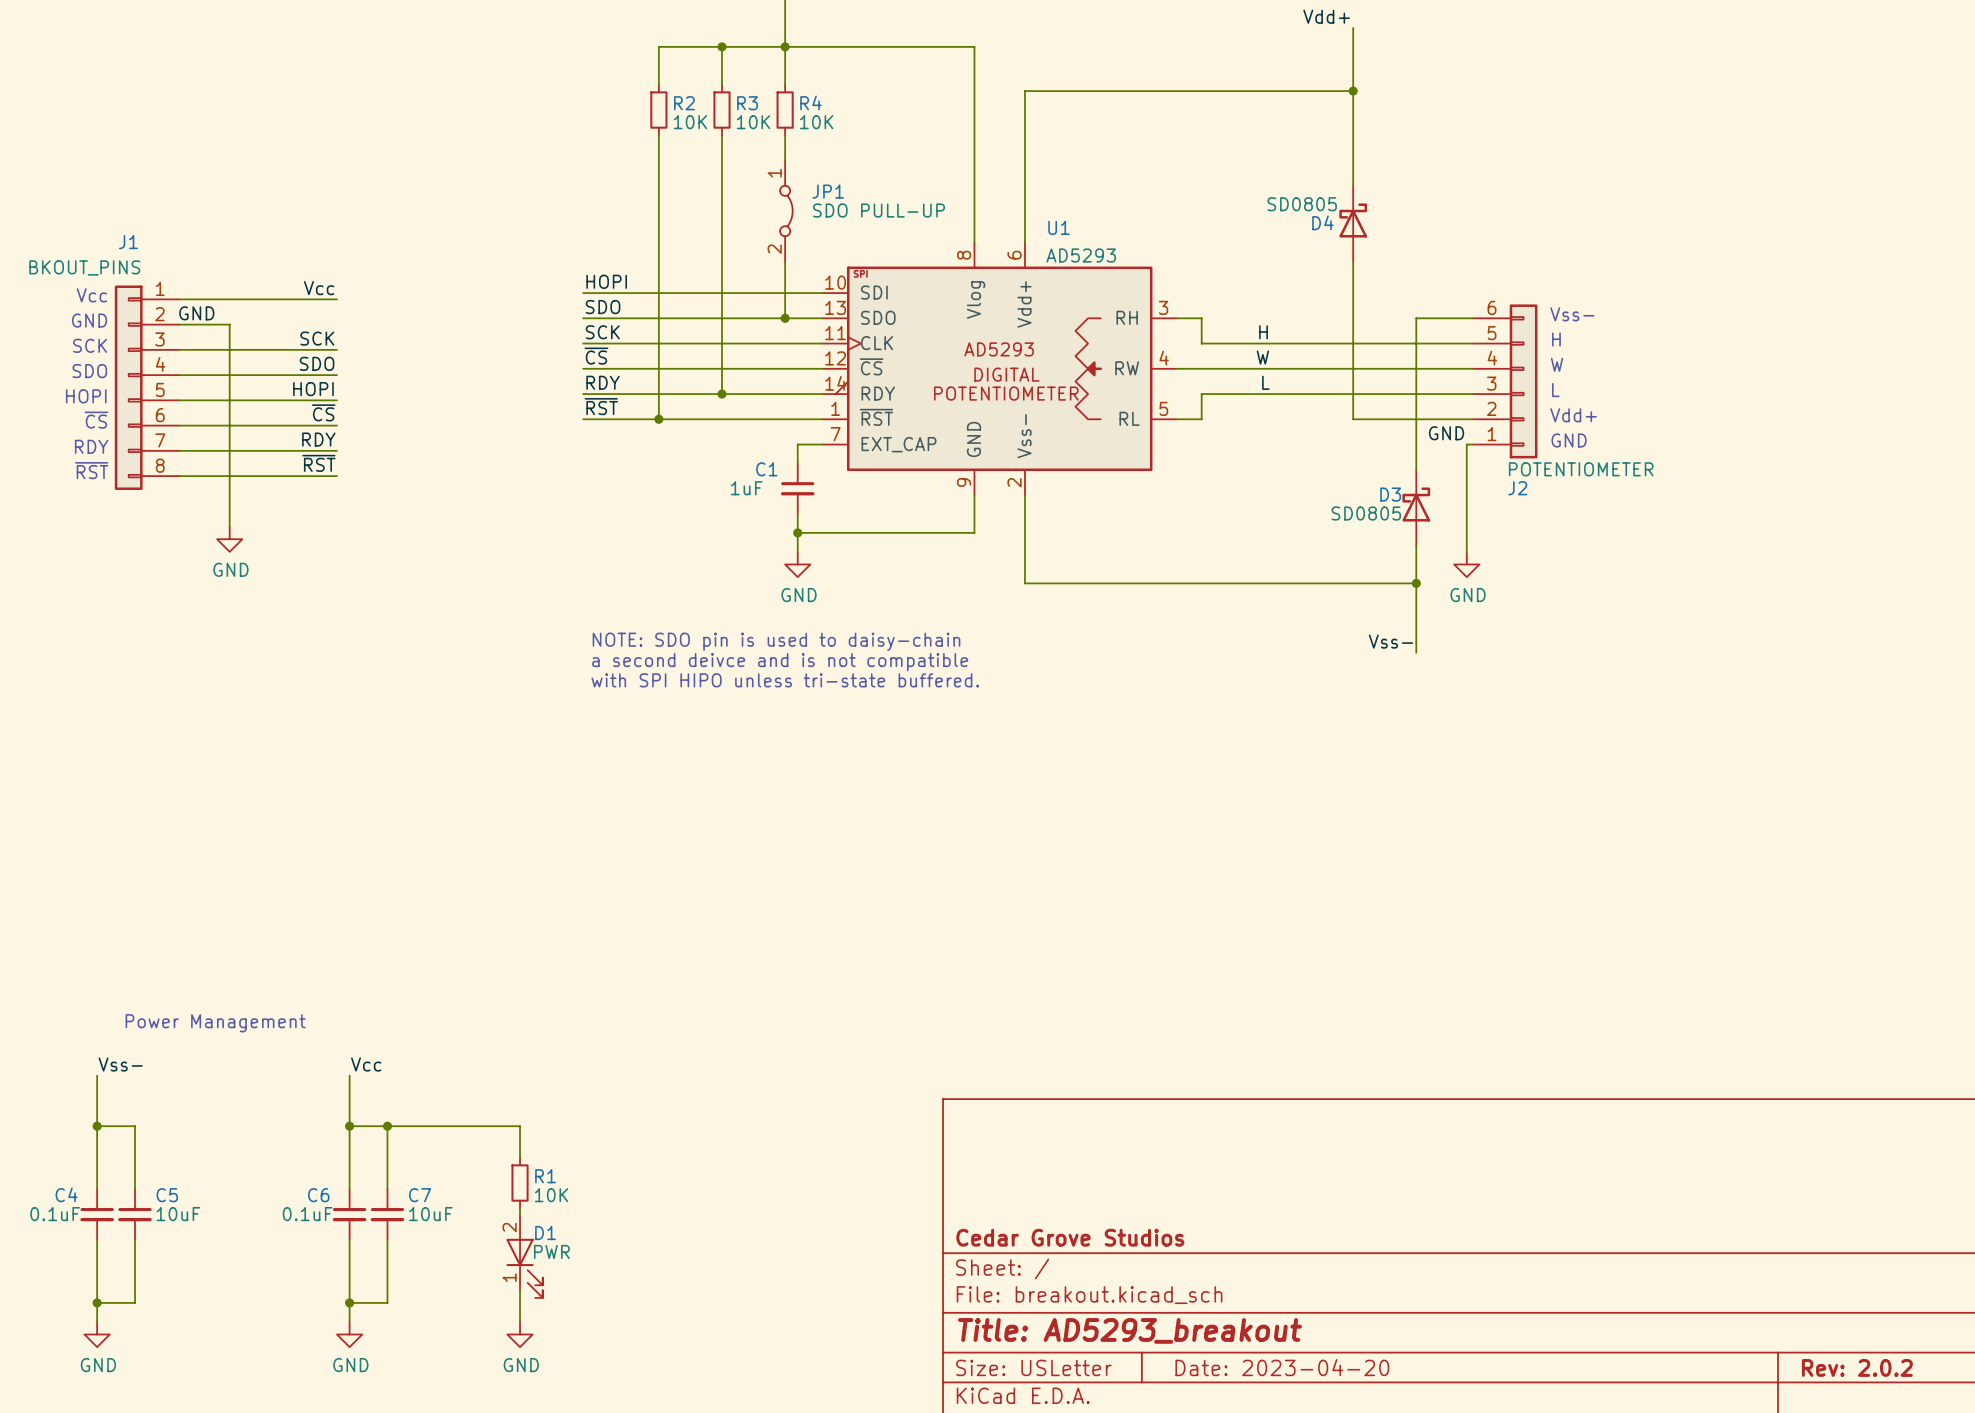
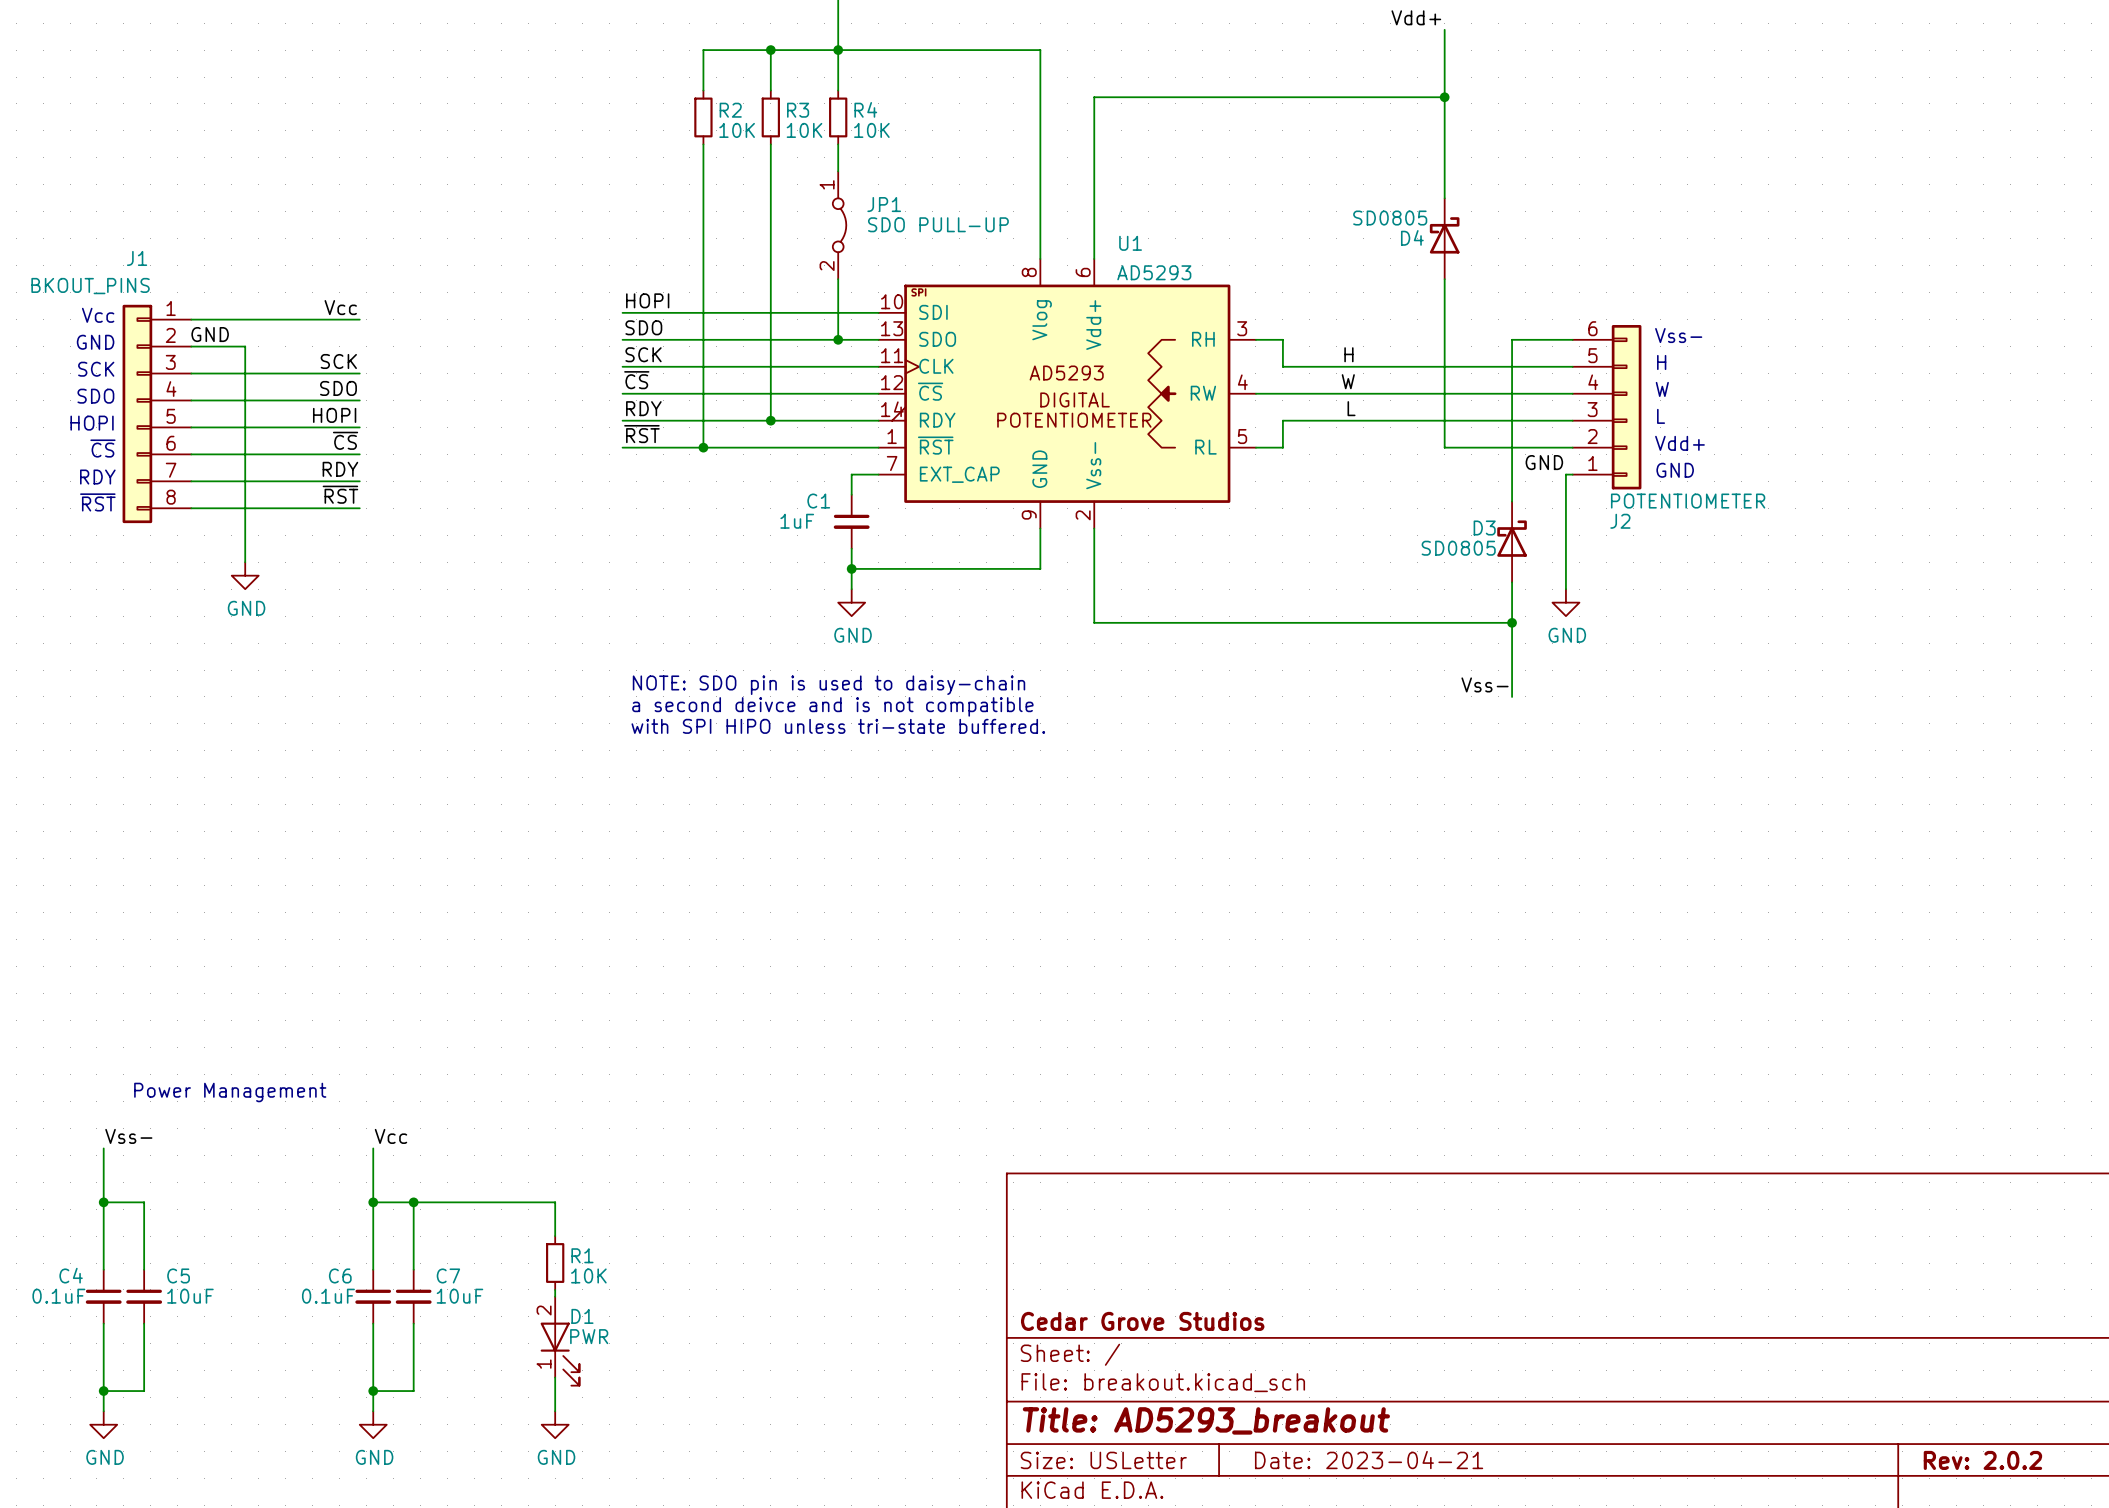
title block: Date: 2023-04-20 (1282, 1367) -> Date: 2023-04-21 (1369, 1460)

